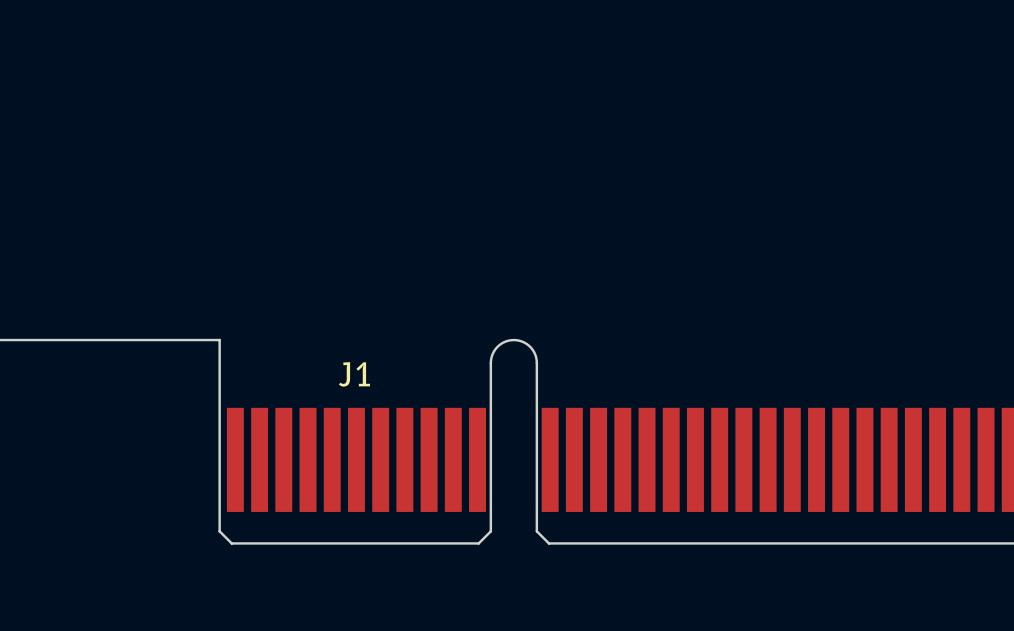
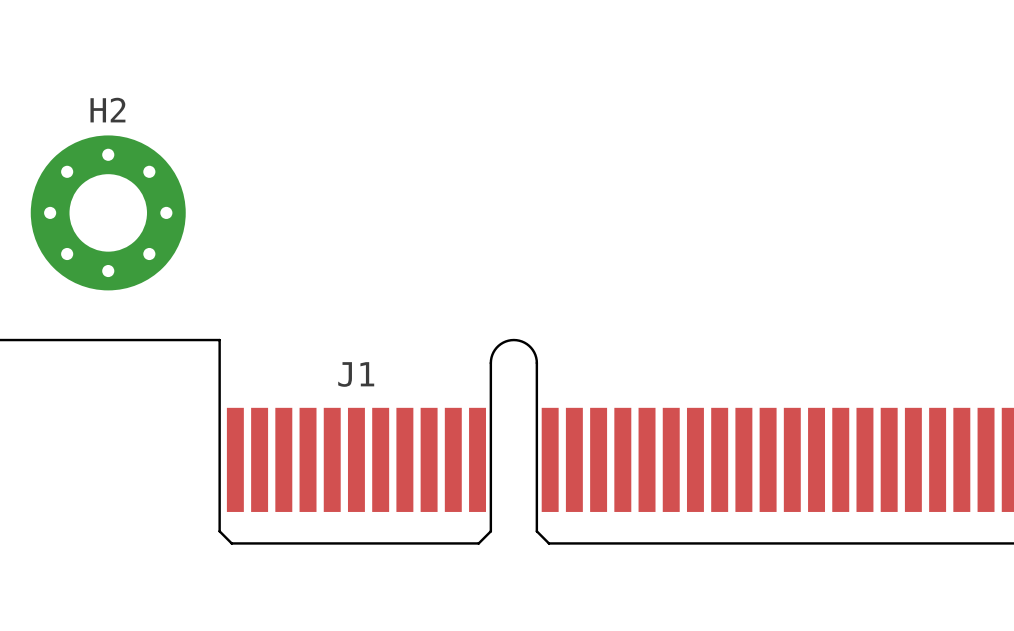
H2: none -> (108, 212)

